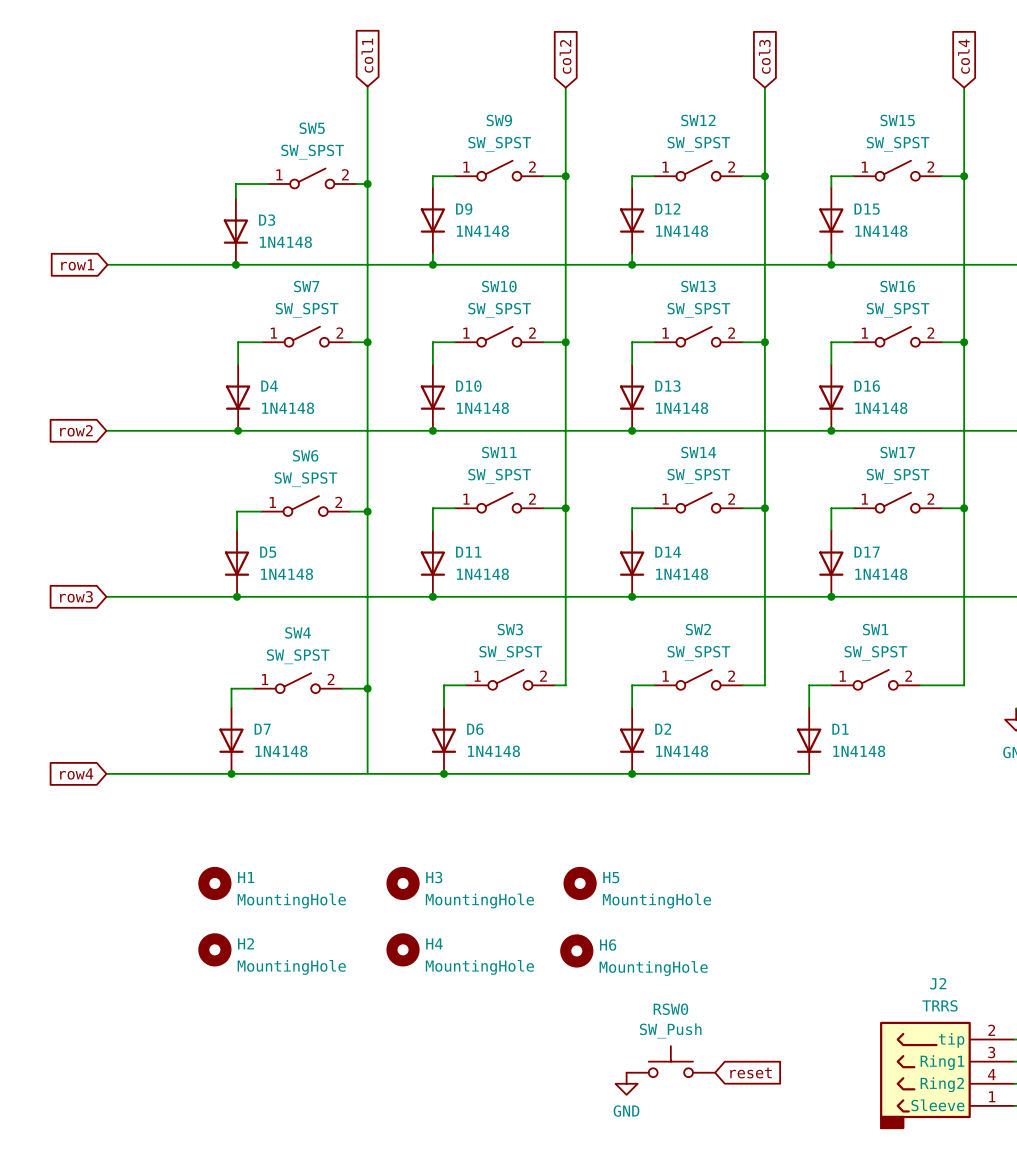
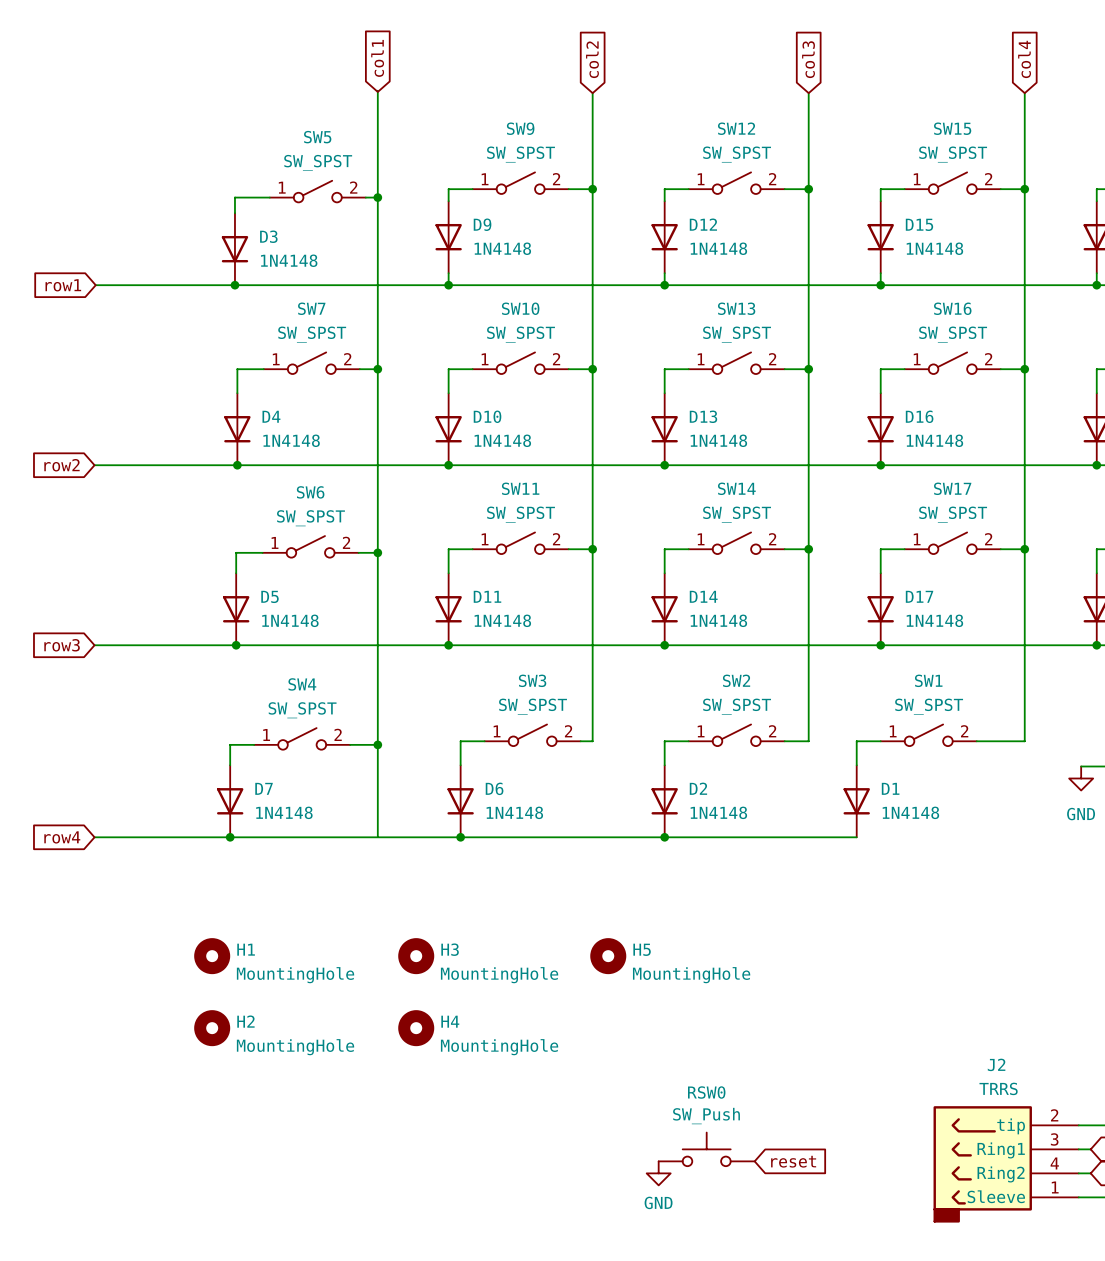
H6: MountingHole (576, 950) -> none

